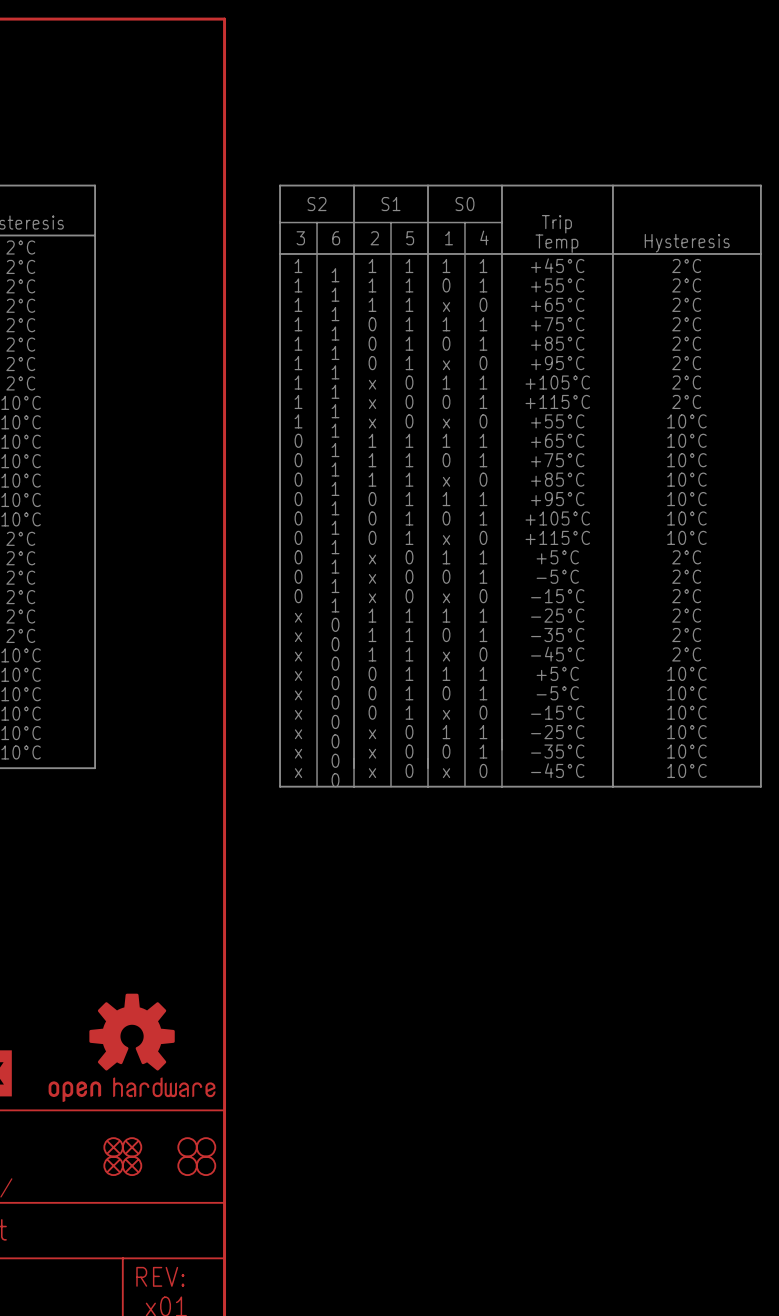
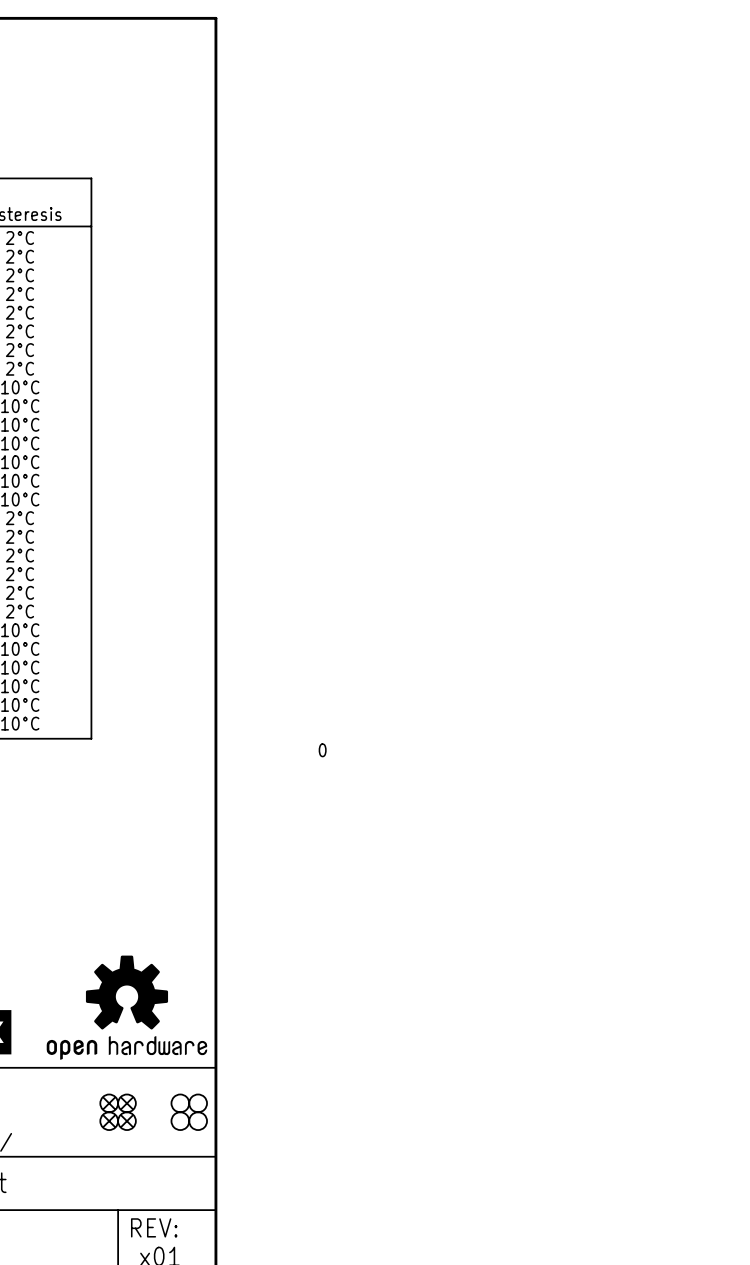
line: (280, 185) (760, 185) (760, 786) (280, 786) (280, 185) -> none
line: (354, 185) (354, 768) -> none
line: (428, 185) (428, 768) -> none
line: (501, 185) (501, 749) -> none
line: (612, 185) (612, 786) -> none
text: S2 (317, 204) -> none
text: S1 (391, 204) -> none
text: S0 (464, 204) -> none
line: (280, 222) (501, 222) -> none
line: (317, 222) (317, 786) -> none
line: (391, 222) (391, 786) -> none
line: (464, 222) (464, 786) -> none
text: Trip (556, 224) -> none
text: 4 (484, 237) -> none
text: 3 (300, 238) -> none
text: 6 (336, 238) -> none
text: 2 (374, 238) -> none
text: 5 (410, 238) -> none
text: 1 (449, 238) -> none
text: Temp (556, 243) -> none
text: Hysteresis (687, 243) -> none
line: (280, 253) (760, 253) -> none
text: +45°C (557, 265) -> none
text: 1 (298, 266) -> none
text: 1 (372, 266) -> none
text: 1 (409, 266) -> none
text: 1 (446, 266) -> none
text: 1 (483, 266) -> none
text: 2°C (686, 266) -> none
text: 1 (335, 275) -> none
text: 1 (298, 285) -> none
text: 1 (372, 285) -> none
text: 1 (409, 285) -> none
text: 0 (446, 285) -> none
text: 1 (483, 285) -> none
text: +55°C (557, 285) -> none
text: 2°C (686, 285) -> none
text: 1 (335, 294) -> none
text: 1 (298, 304) -> none
text: 1 (372, 304) -> none
text: 1 (409, 304) -> none
text: 0 (483, 304) -> none
text: +65°C (557, 304) -> none
text: 2°C (686, 304) -> none
text: x (446, 307) -> none
text: 1 (335, 314) -> none
text: 1 (298, 324) -> none
text: 0 (372, 324) -> none
text: 1 (409, 324) -> none
text: 1 (446, 324) -> none
text: 1 (483, 324) -> none
text: +75°C (557, 324) -> none
text: 2°C (686, 324) -> none
text: 1 (335, 333) -> none
text: 1 (298, 343) -> none
text: 0 (372, 343) -> none
text: 1 (409, 343) -> none
text: 0 (446, 343) -> none
text: 1 (483, 343) -> none
text: +85°C (557, 343) -> none
text: 2°C (686, 343) -> none
text: 1 (335, 352) -> none
text: 1 (298, 363) -> none
text: 0 (372, 363) -> none
text: 1 (409, 363) -> none
text: 0 (483, 363) -> none
text: +95°C (557, 363) -> none
text: 2°C (686, 363) -> none
text: x (446, 365) -> none
text: 1 (335, 372) -> none
text: 1 (298, 382) -> none
text: 0 (409, 382) -> none
text: 1 (446, 382) -> none
text: 1 (483, 382) -> none
text: +105°C (557, 382) -> none
text: 2°C (686, 382) -> none
text: x (372, 384) -> none
text: 1 (335, 391) -> none
text: 1 (298, 401) -> none
text: 0 (409, 401) -> none
text: 0 (446, 401) -> none
text: 1 (483, 401) -> none
text: +115°C (557, 401) -> none
text: 2°C (686, 401) -> none
text: x (372, 404) -> none
text: 1 (335, 411) -> none
text: 1 (298, 421) -> none
text: 0 (409, 421) -> none
text: 0 (483, 421) -> none
text: +55°C (557, 421) -> none
text: 10°C (686, 421) -> none
text: x (372, 423) -> none
text: x (446, 423) -> none
text: 1 (335, 430) -> none
text: 0 (298, 440) -> none
text: 1 (372, 440) -> none
text: 1 (409, 440) -> none
text: 1 (446, 440) -> none
text: 1 (483, 440) -> none
text: +65°C (557, 440) -> none
text: 10°C (686, 440) -> none
text: 1 (335, 450) -> none
text: 0 (298, 460) -> none
text: 1 (372, 460) -> none
text: 1 (409, 460) -> none
text: 0 (446, 460) -> none
text: 1 (483, 460) -> none
text: +75°C (557, 460) -> none
text: 10°C (686, 460) -> none
text: 1 (335, 469) -> none
text: 0 (298, 479) -> none
text: 1 (372, 479) -> none
text: 1 (409, 479) -> none
text: 0 (483, 479) -> none
text: +85°C (557, 479) -> none
text: 10°C (686, 479) -> none
text: x (446, 481) -> none
text: 1 (335, 488) -> none
text: 0 (298, 499) -> none
text: 0 (372, 499) -> none
text: 1 (409, 499) -> none
text: 1 (446, 499) -> none
text: 1 (483, 499) -> none
text: +95°C (557, 499) -> none
text: 10°C (686, 499) -> none
text: 1 (335, 508) -> none
text: 0 (298, 518) -> none
text: 0 (372, 518) -> none
text: 1 (409, 518) -> none
text: 0 (446, 518) -> none
text: 1 (483, 518) -> none
text: +105°C (557, 518) -> none
text: 10°C (686, 518) -> none
text: 1 (335, 527) -> none
text: 0 (298, 537) -> none
text: 0 (372, 537) -> none
text: 1 (409, 537) -> none
text: 0 (483, 537) -> none
text: +115°C (557, 537) -> none
text: 10°C (686, 537) -> none
text: x (446, 540) -> none
text: 1 (335, 547) -> none
text: 0 (298, 557) -> none
text: 0 (409, 557) -> none
text: 1 (446, 557) -> none
text: 1 (483, 557) -> none
text: +5°C (557, 557) -> none
text: 2°C (686, 557) -> none
text: x (372, 559) -> none
text: 1 (335, 566) -> none
text: 0 (298, 576) -> none
text: 0 (409, 576) -> none
text: 0 (446, 576) -> none
text: 1 (483, 576) -> none
text: -5°C (557, 576) -> none
text: 2°C (686, 576) -> none
text: x (372, 578) -> none
text: 1 (335, 585) -> none
text: 0 (298, 596) -> none
text: 0 (409, 596) -> none
text: 0 (483, 596) -> none
text: -15°C (557, 596) -> none
text: 2°C (686, 596) -> none
text: x (372, 598) -> none
text: x (446, 598) -> none
text: 1 (335, 605) -> none
text: 1 (372, 615) -> none
text: 1 (409, 615) -> none
text: 1 (446, 615) -> none
text: 1 (483, 615) -> none
text: -25°C (557, 615) -> none
text: 2°C (686, 615) -> none
text: x (298, 617) -> none
text: 0 (335, 624) -> none
text: 1 (372, 635) -> none
text: 1 (409, 635) -> none
text: 0 (446, 635) -> none
text: 1 (483, 635) -> none
text: -35°C (557, 635) -> none
text: 2°C (686, 635) -> none
text: x (298, 637) -> none
text: 0 (335, 644) -> none
text: 1 (372, 654) -> none
text: 1 (409, 654) -> none
text: 0 (483, 654) -> none
text: -45°C (557, 654) -> none
text: 2°C (686, 654) -> none
text: x (298, 656) -> none
text: x (446, 656) -> none
text: 0 (335, 663) -> none
text: 0 (372, 673) -> none
text: 1 (409, 673) -> none
text: 1 (446, 673) -> none
text: 1 (483, 673) -> none
text: +5°C (557, 673) -> none
text: 10°C (686, 673) -> none
text: x (298, 676) -> none
text: 0 (335, 683) -> none
text: 0 (372, 693) -> none
text: 1 (409, 693) -> none
text: 0 (446, 693) -> none
text: 1 (483, 693) -> none
text: -5°C (557, 693) -> none
text: 10°C (686, 693) -> none
text: x (298, 695) -> none
text: 0 (335, 702) -> none
text: 0 (372, 712) -> none
text: 1 (409, 712) -> none
text: 0 (483, 712) -> none
text: -15°C (557, 712) -> none
text: 10°C (686, 712) -> none
text: x (298, 714) -> none
text: x (446, 714) -> none
text: 0 (335, 721) -> none
text: 0 (409, 732) -> none
text: 1 (446, 732) -> none
text: 1 (483, 732) -> none
text: -25°C (557, 732) -> none
text: 10°C (686, 732) -> none
text: x (298, 734) -> none
text: x (372, 734) -> none
line: (501, 740) (501, 786) -> none
text: 0 (335, 741) -> none
text: 0 (409, 751) -> none
text: 0 (446, 751) -> none
text: 1 (483, 751) -> none
text: -35°C (557, 751) -> none
text: 10°C (686, 751) -> none
text: x (298, 753) -> none
text: x (372, 753) -> none
line: (354, 758) (354, 786) -> none
line: (428, 758) (428, 786) -> none
text: 0 (335, 760) -> none
text: 0 (409, 770) -> none
text: 0 (483, 770) -> none
text: -45°C (557, 770) -> none
text: 10°C (686, 770) -> none
text: x (298, 773) -> none
text: x (372, 773) -> none
text: x (446, 773) -> none

